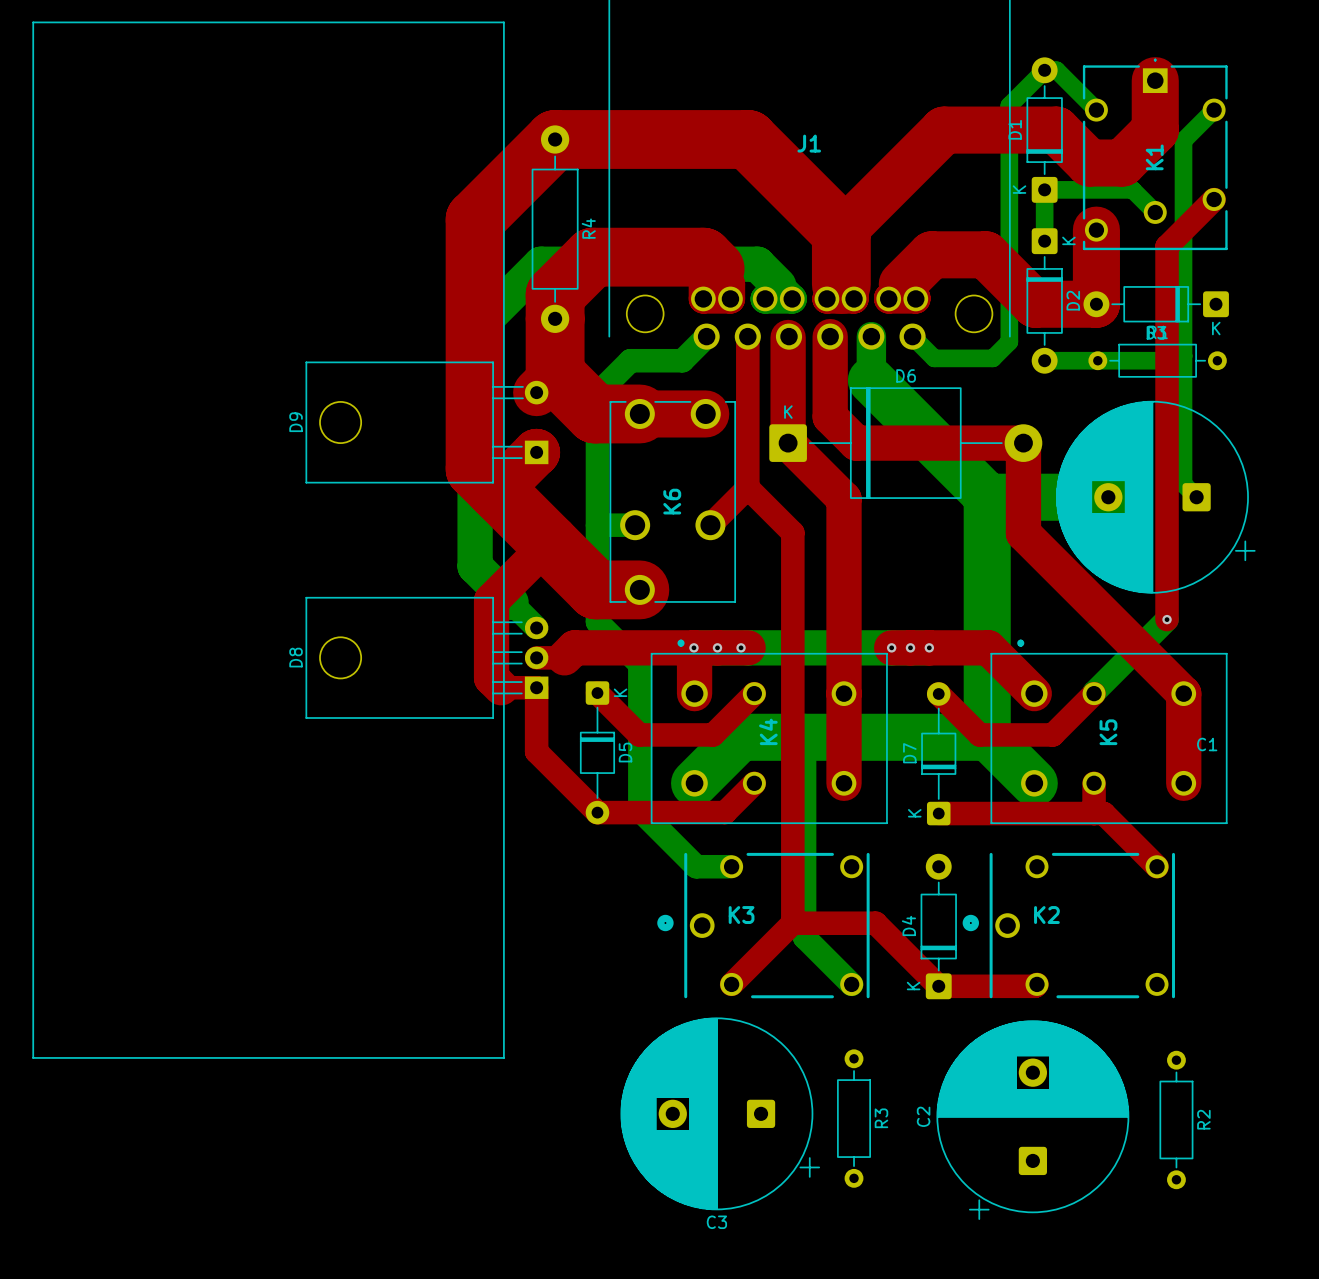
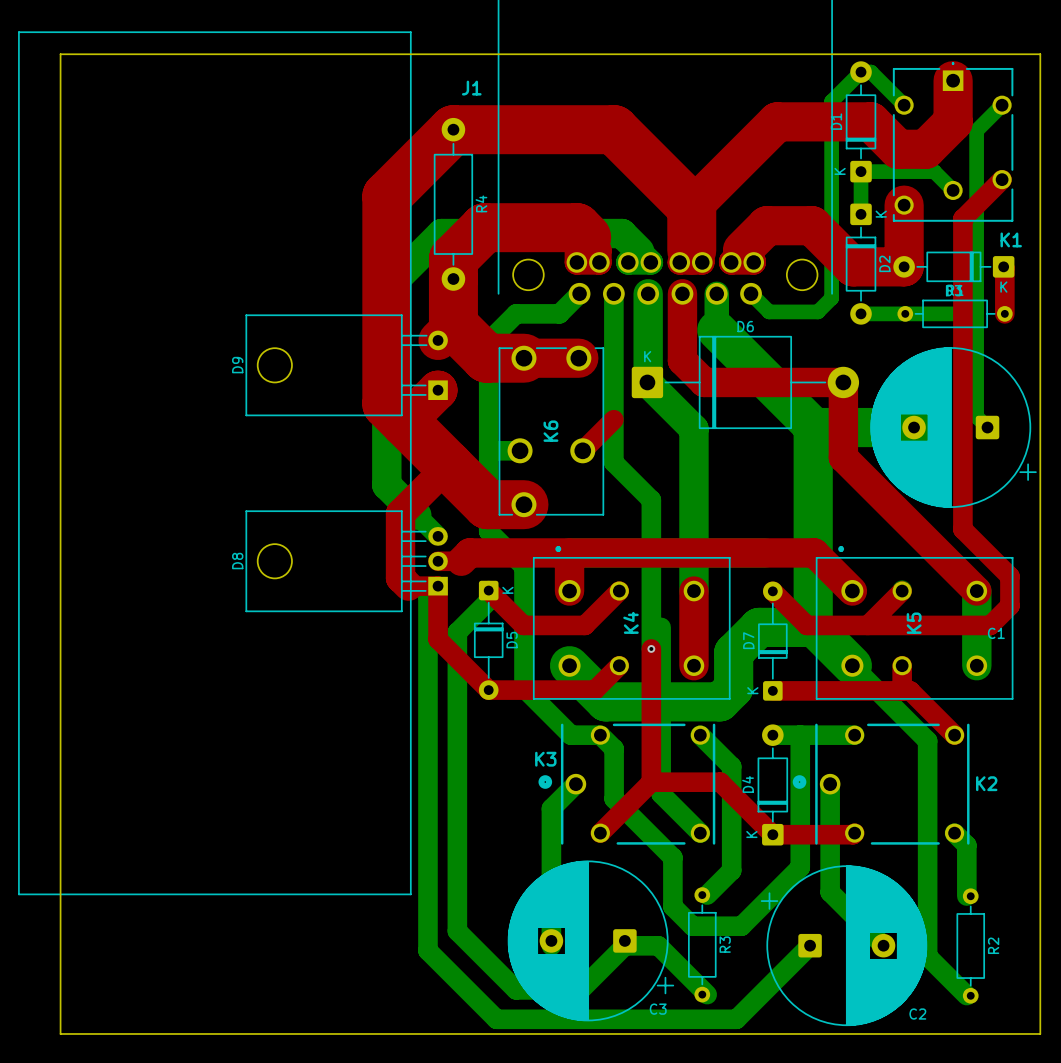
board edge: none -> (60, 54) (1040, 54) (1040, 1033) (60, 1033) (60, 54)
J1 name position: J1 (809, 143) -> J1 (471, 88)
K1 name rotation: 0° (1154, 157) -> 90° clockwise (1011, 239)
K1 name position: K1 (1154, 157) -> K1 (1011, 239)
top track: none -> (1003, 266) (1004, 313)
bottom track: none -> (613, 293) (613, 462) (651, 500) (651, 648)
top track: (747, 336) (747, 487) (792, 532) (792, 763) -> none
bottom track: none -> (648, 293) (647, 382) (693, 429) (693, 591)
top track: (788, 337) (788, 443) (844, 499) (844, 693) -> none
bottom track: (1167, 619) (1094, 692) -> none
top track: none -> (962, 529) (1009, 576) (1009, 605) (990, 625) (867, 625)
via: (1167, 619) -> none
via: (693, 647) -> none
via: (717, 647) -> none
via: (741, 647) -> none
top track: none -> (614, 552) (733, 552)
via: (891, 647) -> none
via: (910, 647) -> none
via: (929, 647) -> none
bottom track: none -> (438, 586) (427, 596) (427, 950) (496, 1019) (736, 1019) (810, 945)
bottom track: none -> (488, 590) (488, 600) (457, 632) (457, 931) (516, 989) (580, 989) (624, 945) (658, 945) (707, 994)
bottom track: none -> (976, 591) (976, 665)
top track: (1183, 693) (1183, 783) -> none
bottom track: (922, 737) (740, 737) (694, 783) -> (759, 627) (733, 652) (733, 688) (719, 701) (605, 701) (569, 665)
via: none -> (651, 648)
bottom track: none -> (852, 665) (927, 740) (927, 956) (966, 995)
bottom track: none -> (600, 735) (614, 748) (614, 798) (672, 857) (672, 906) (692, 926) (741, 926) (800, 867) (800, 735)
bottom track: none -> (700, 735) (731, 766) (731, 870) (707, 895)
bottom track: none -> (772, 735) (854, 735)
K3 name position: K3 (741, 915) -> K3 (545, 759)
K2 name position: K2 (1046, 915) -> K2 (986, 783)
bottom track: none -> (575, 784) (551, 808) (551, 945)
bottom track: none -> (830, 784) (830, 892) (883, 945)
bottom track: none -> (954, 833) (966, 845) (966, 896)
C2 name position: C2 (923, 1116) -> C2 (917, 1014)
C2 rotation: 0° (1032, 1120) -> 90° clockwise (844, 945)
C3 name position: C3 (716, 1222) -> C3 (658, 1009)

